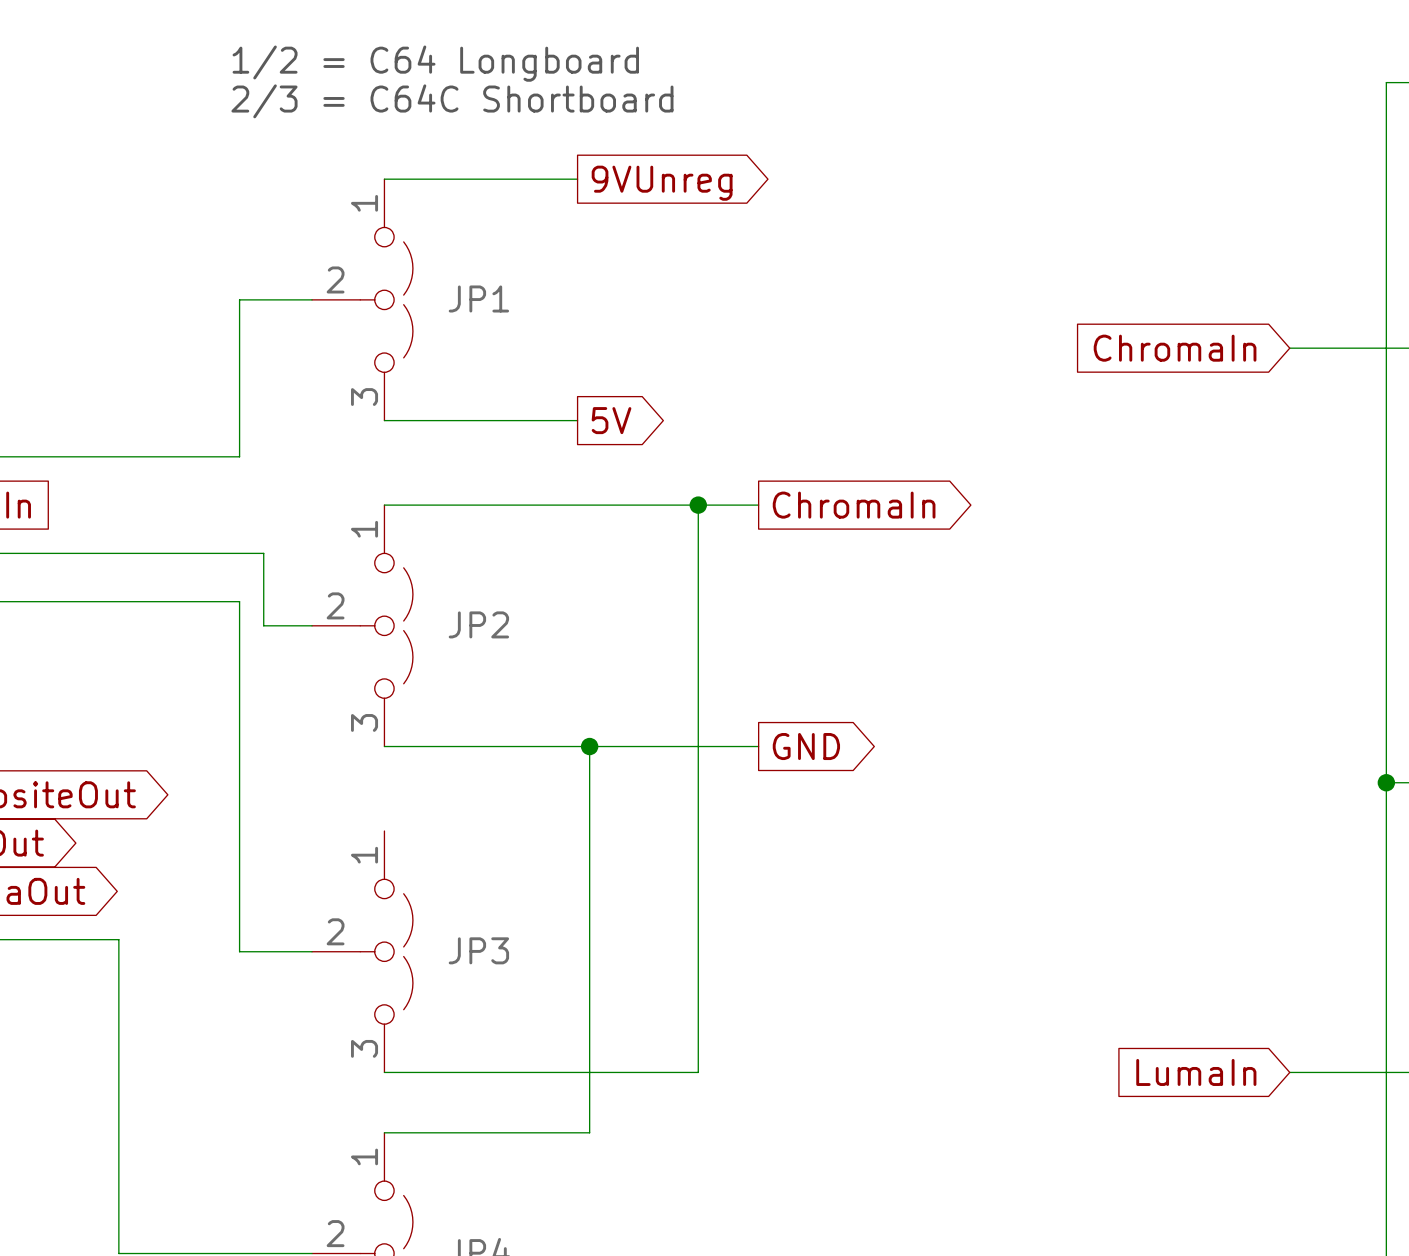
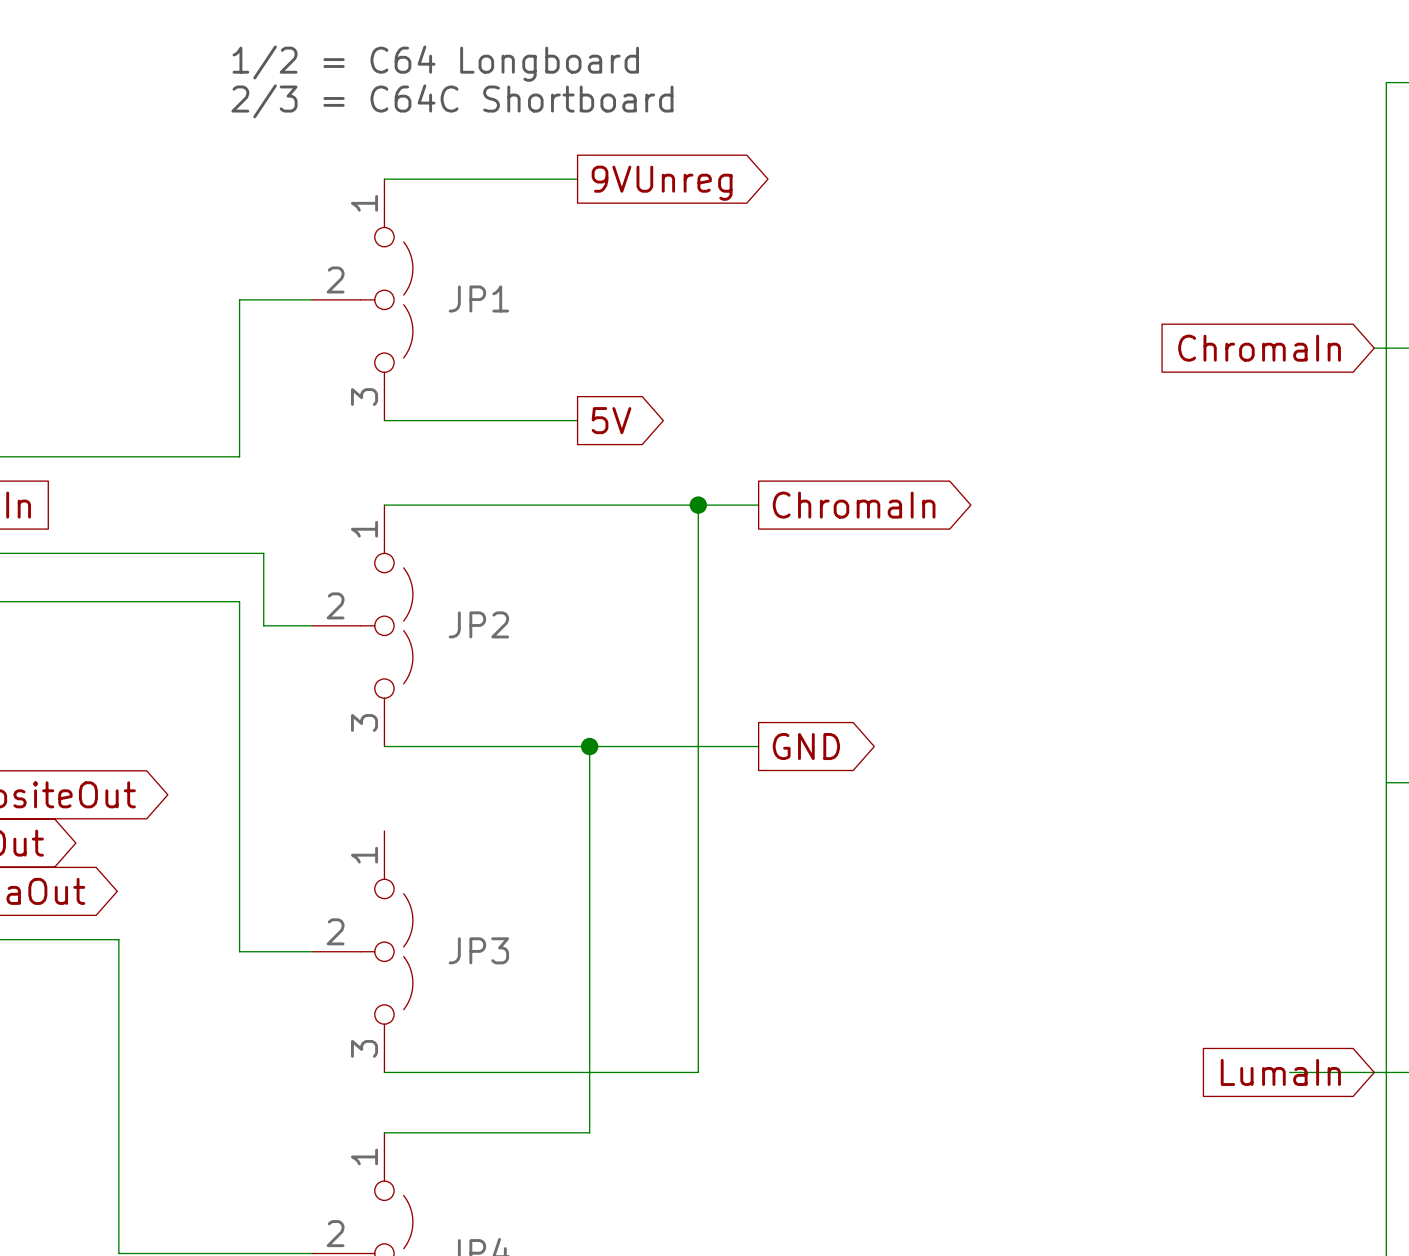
global label position: ChromaIn (1175, 348) -> ChromaIn (1259, 348)
wire: (1289, 348) (1374, 348) -> none
junction: (1386, 782) -> none
global label position: LumaIn (1196, 1072) -> LumaIn (1280, 1072)

